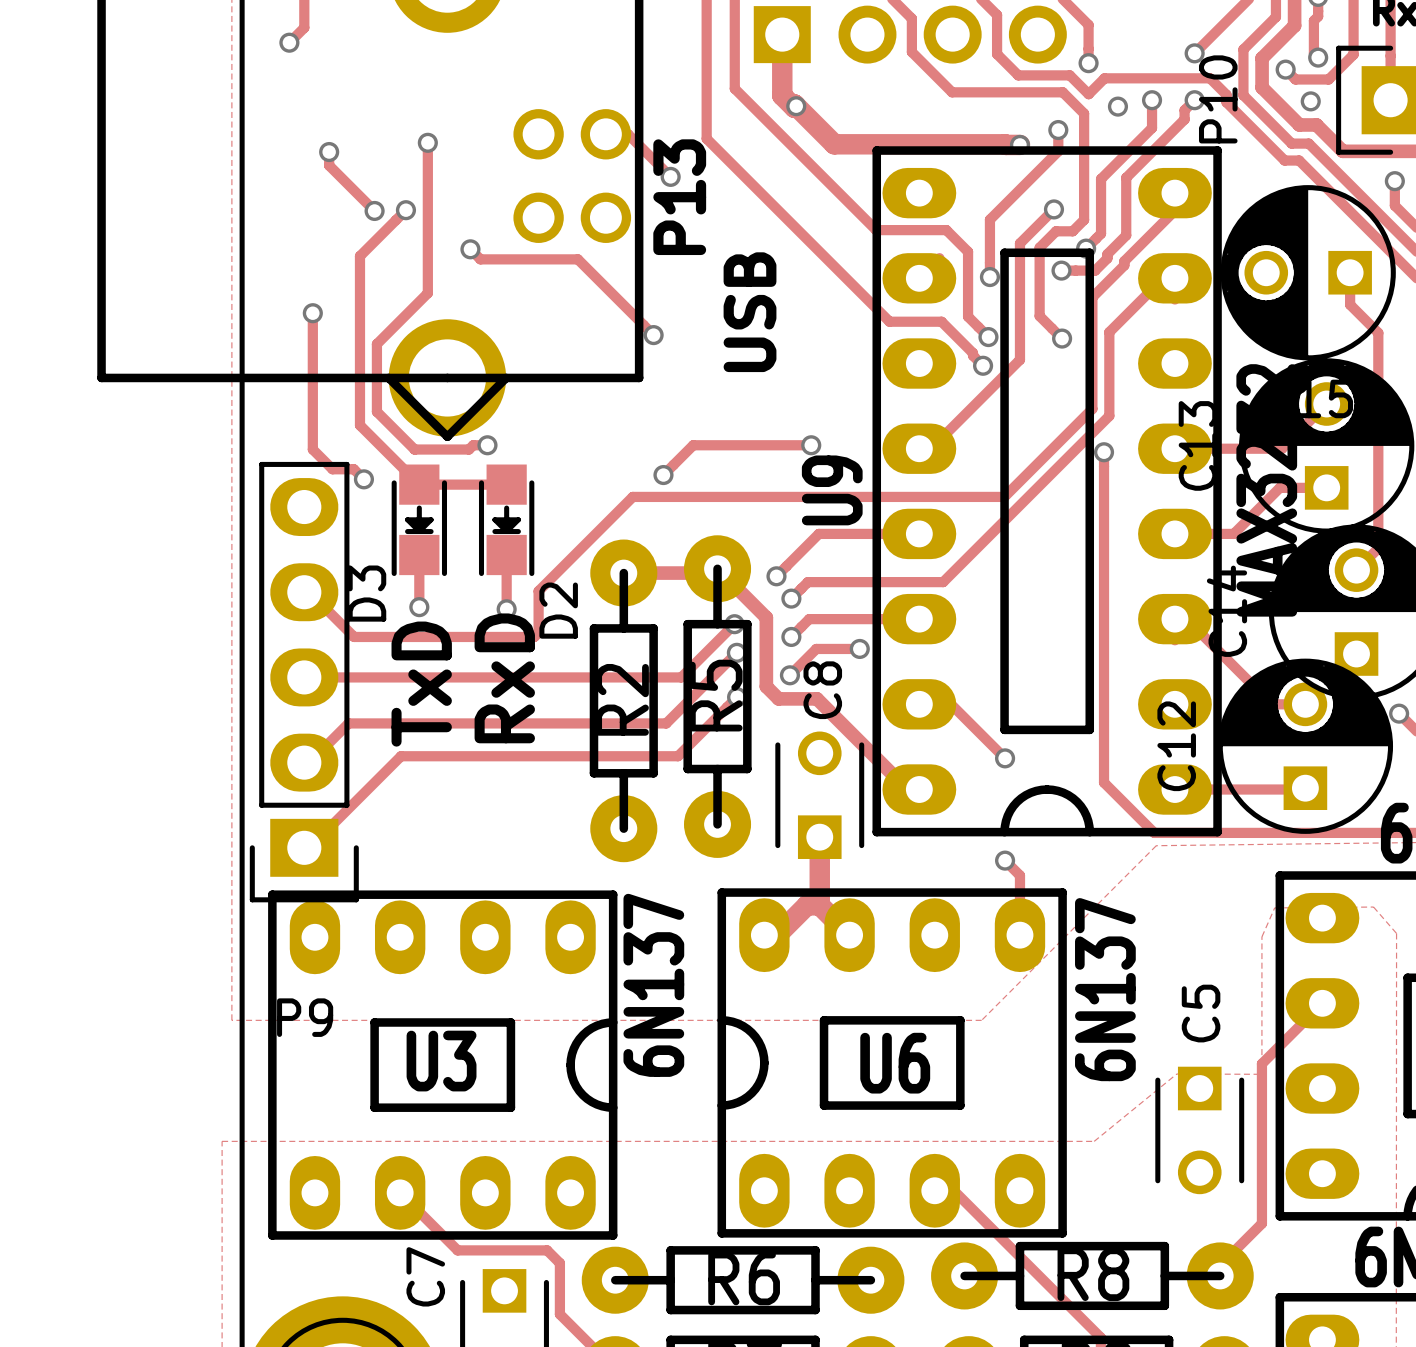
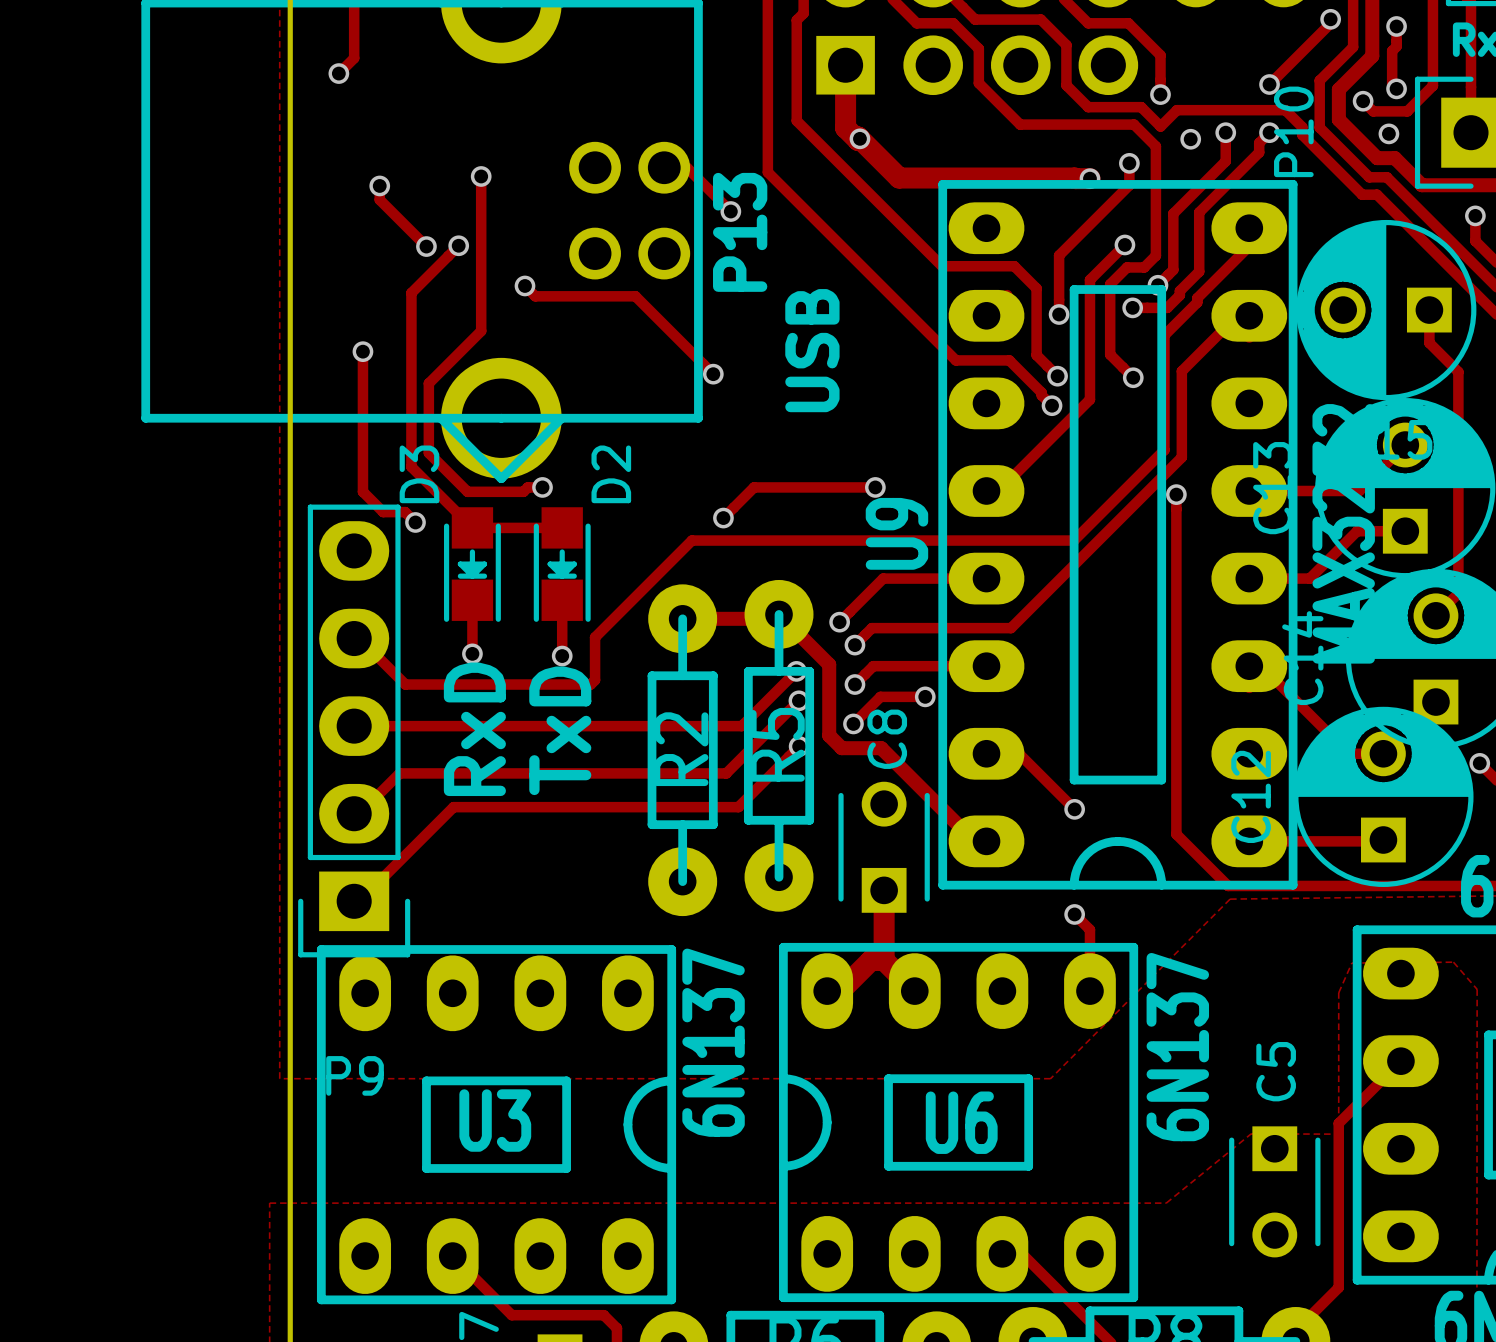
D3 name position: D3 (366, 593) -> D3 (419, 474)
D2 name position: D2 (558, 610) -> D2 (611, 474)
text: RxD (504, 678) -> TxD (560, 730)
text: TxD (421, 684) -> RxD (474, 729)

